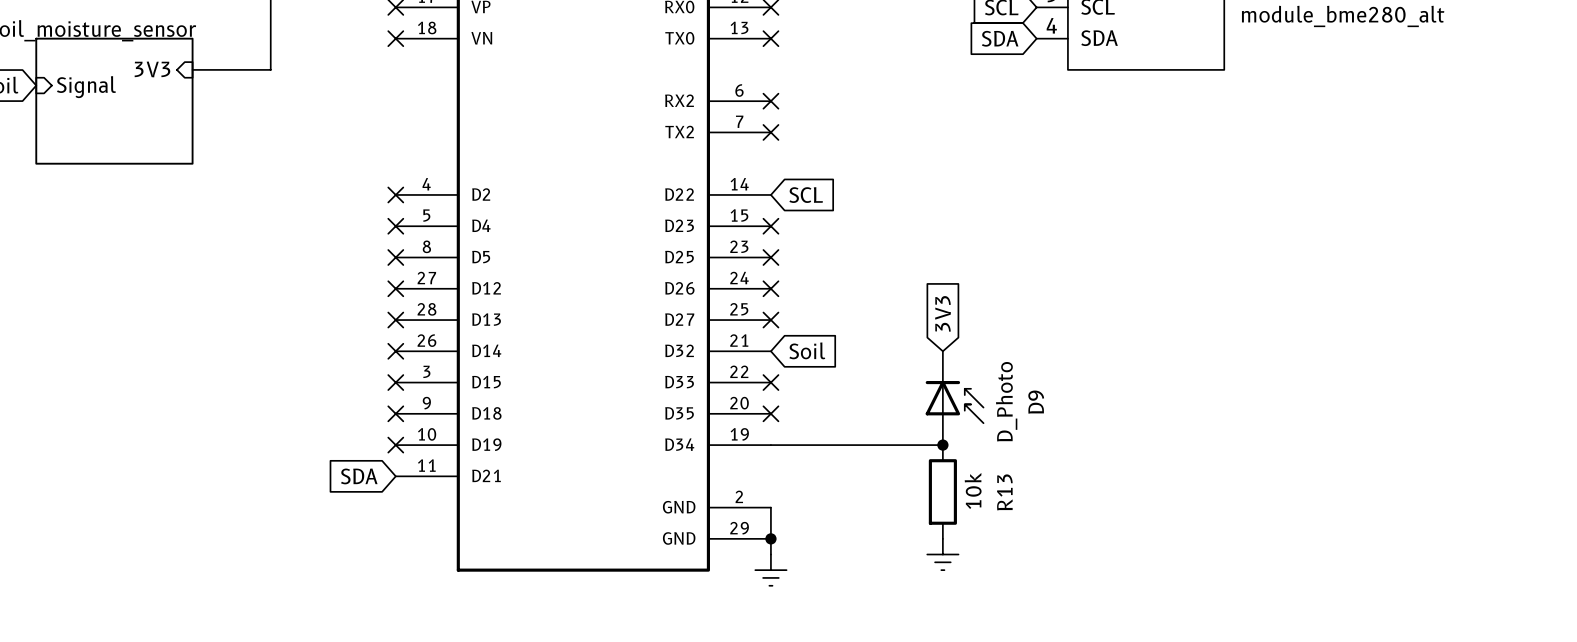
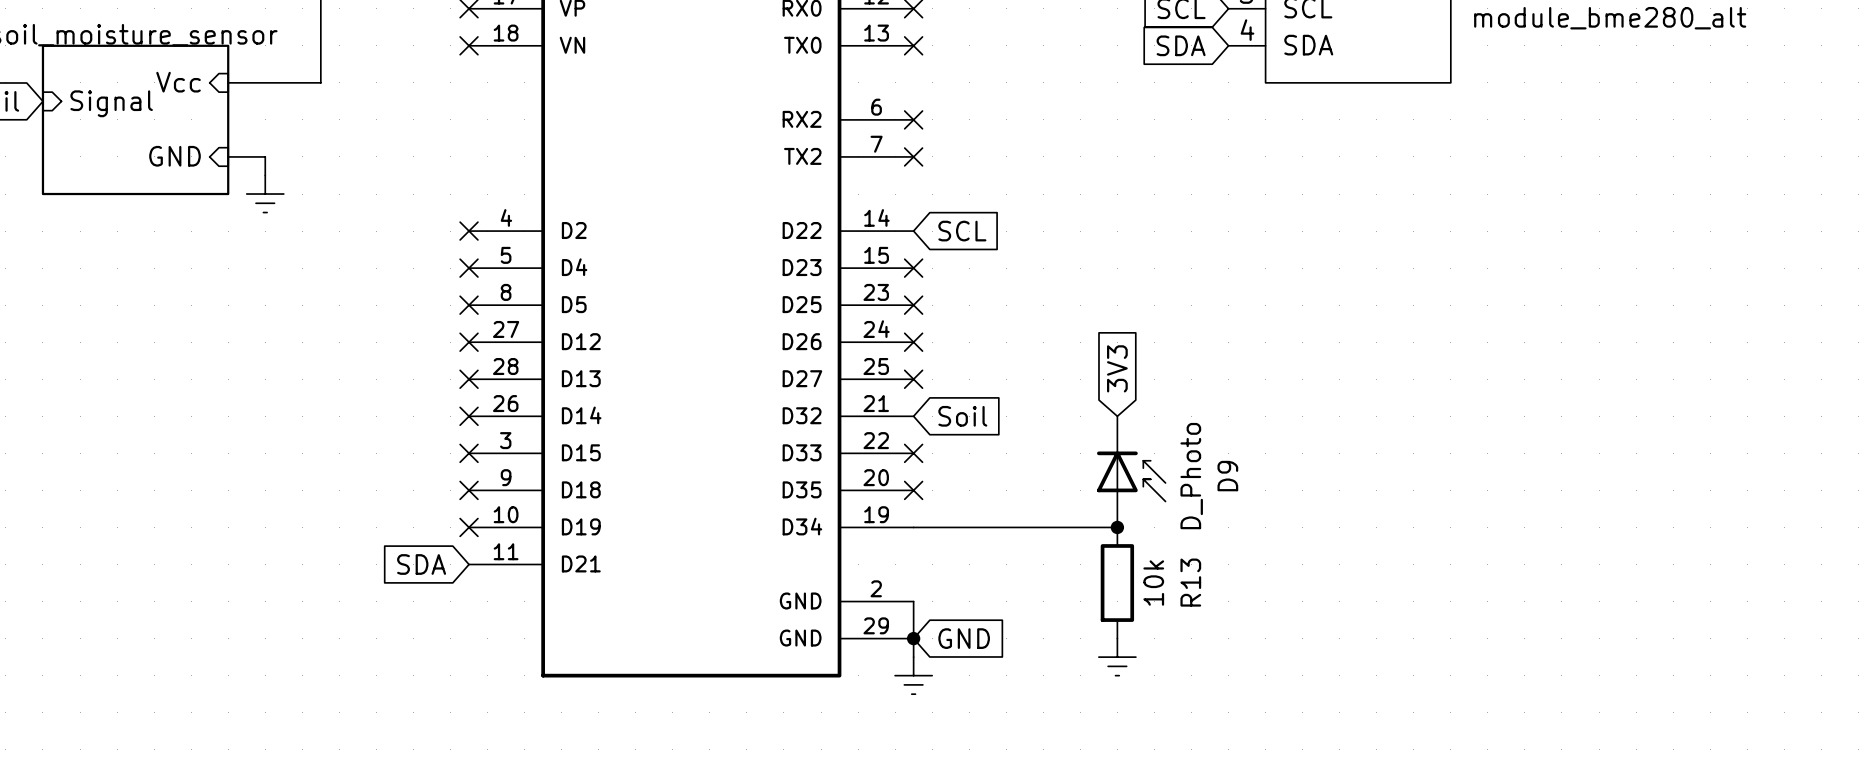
sheet pin: 3V3 (152, 69) -> Vcc (178, 82)
sheet pin: none -> GND (175, 156)
wire: none -> (228, 156) (265, 156) (265, 175)
power symbol: none -> (265, 194)
global label: none -> GND (964, 638)

